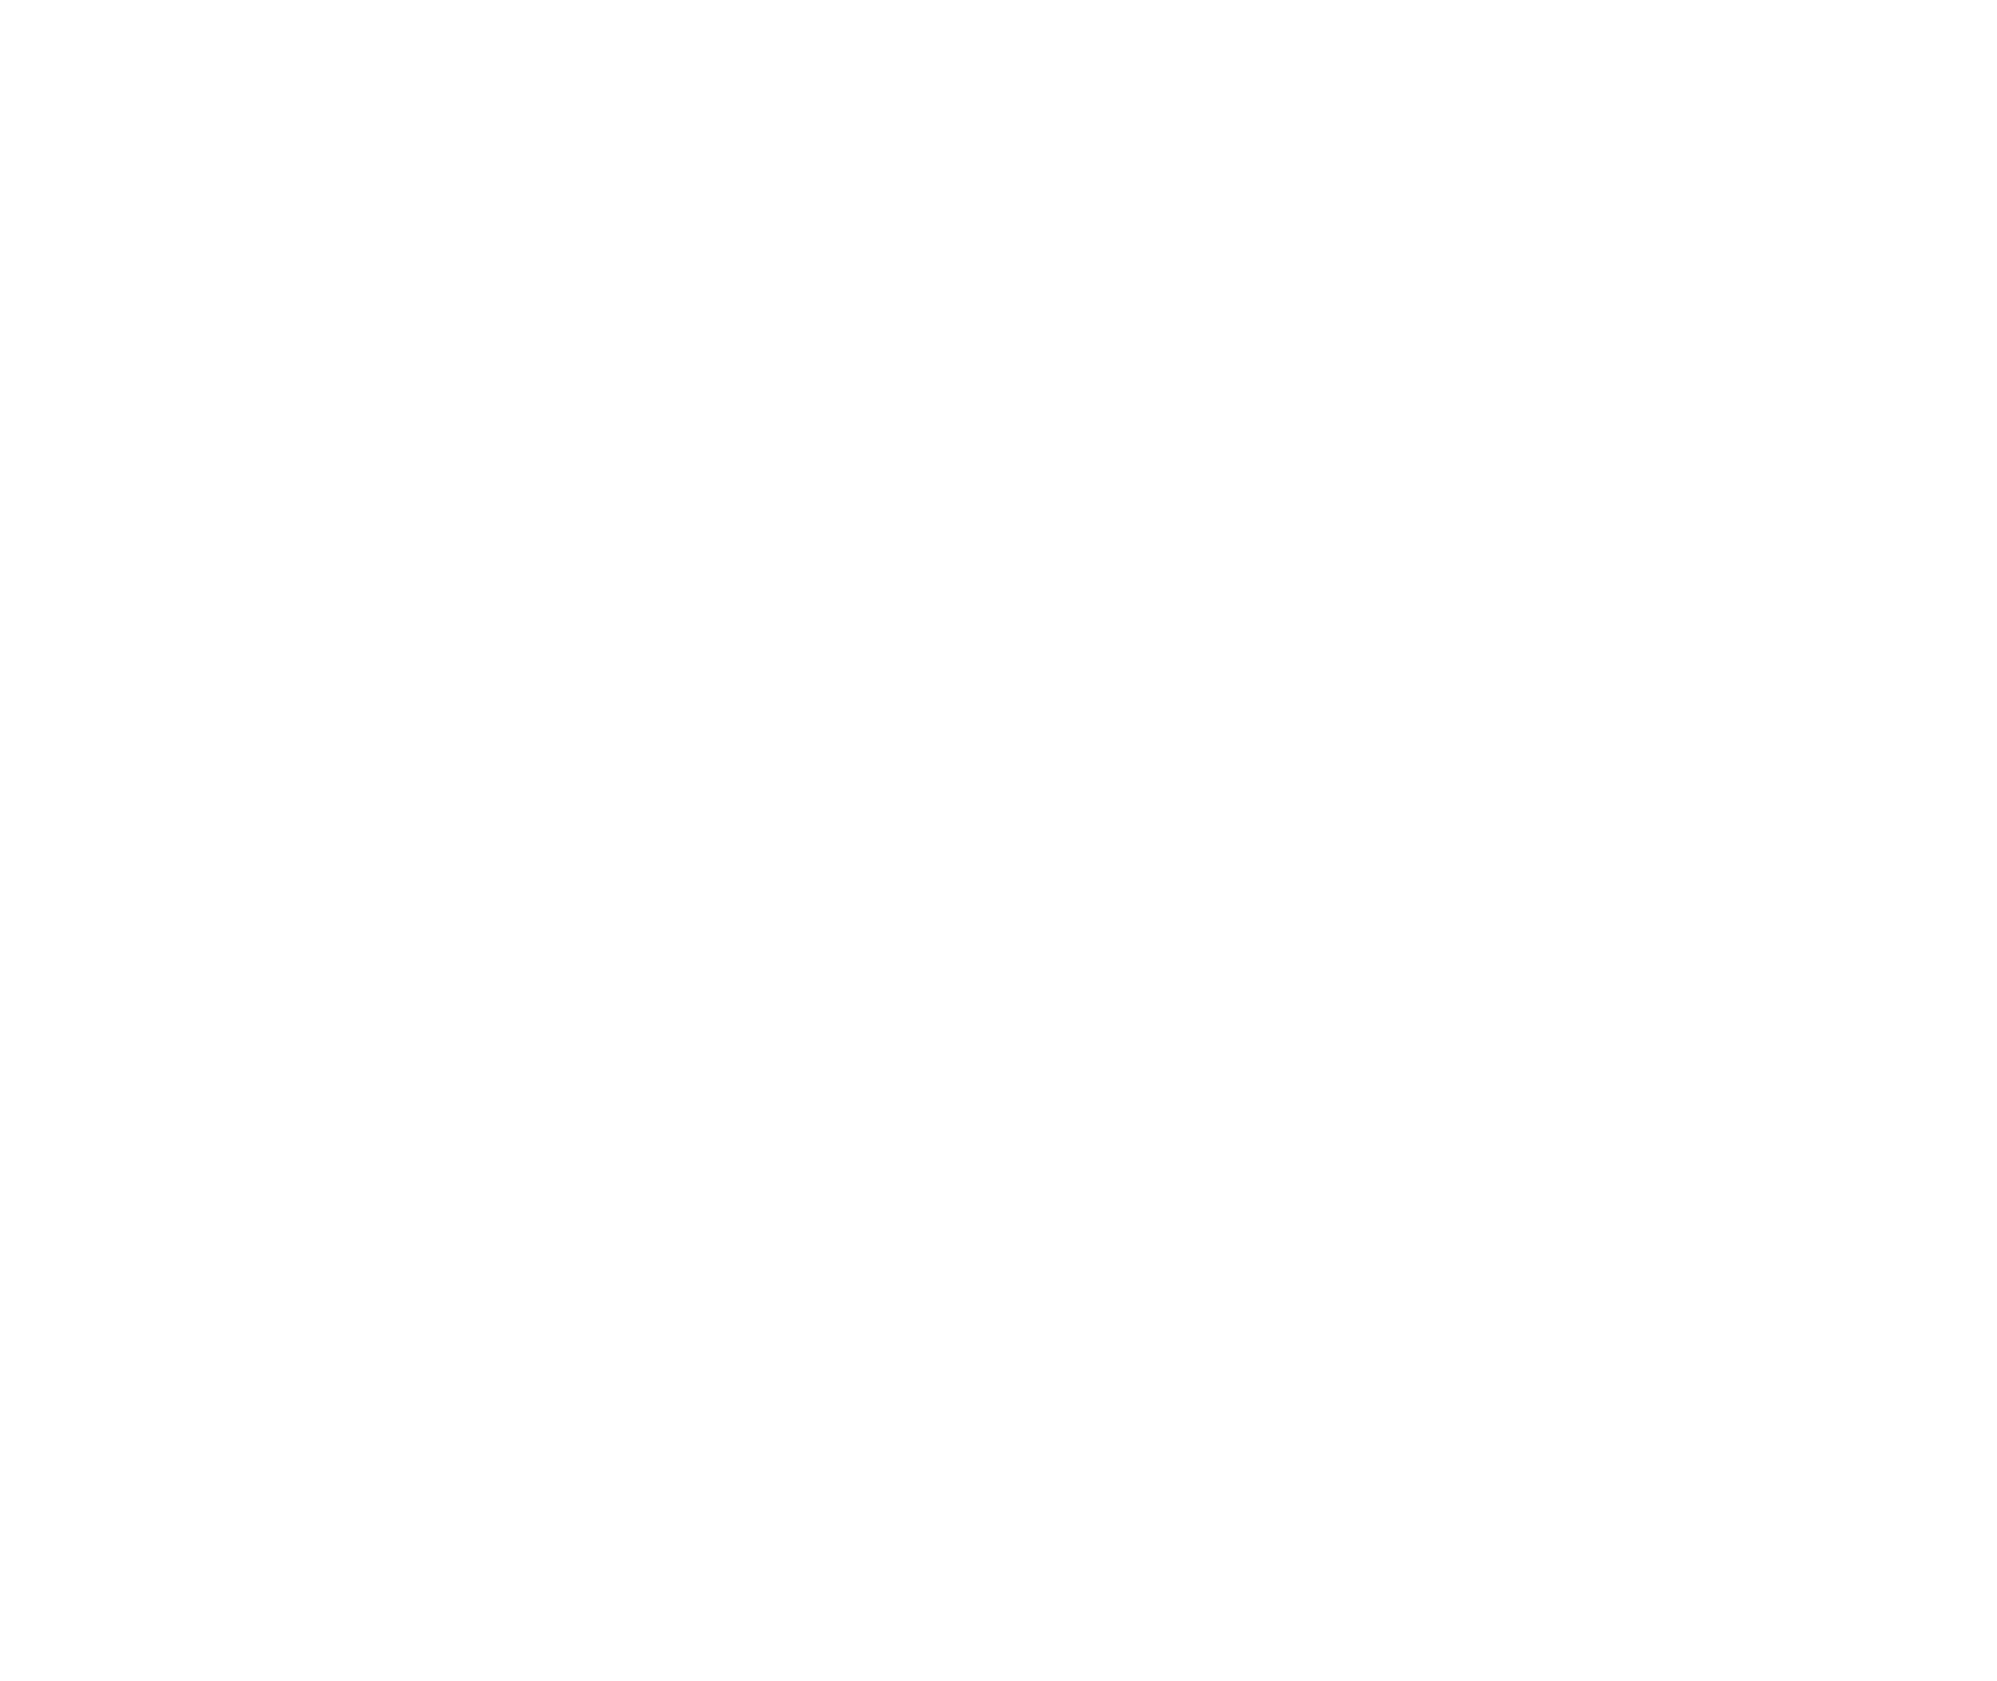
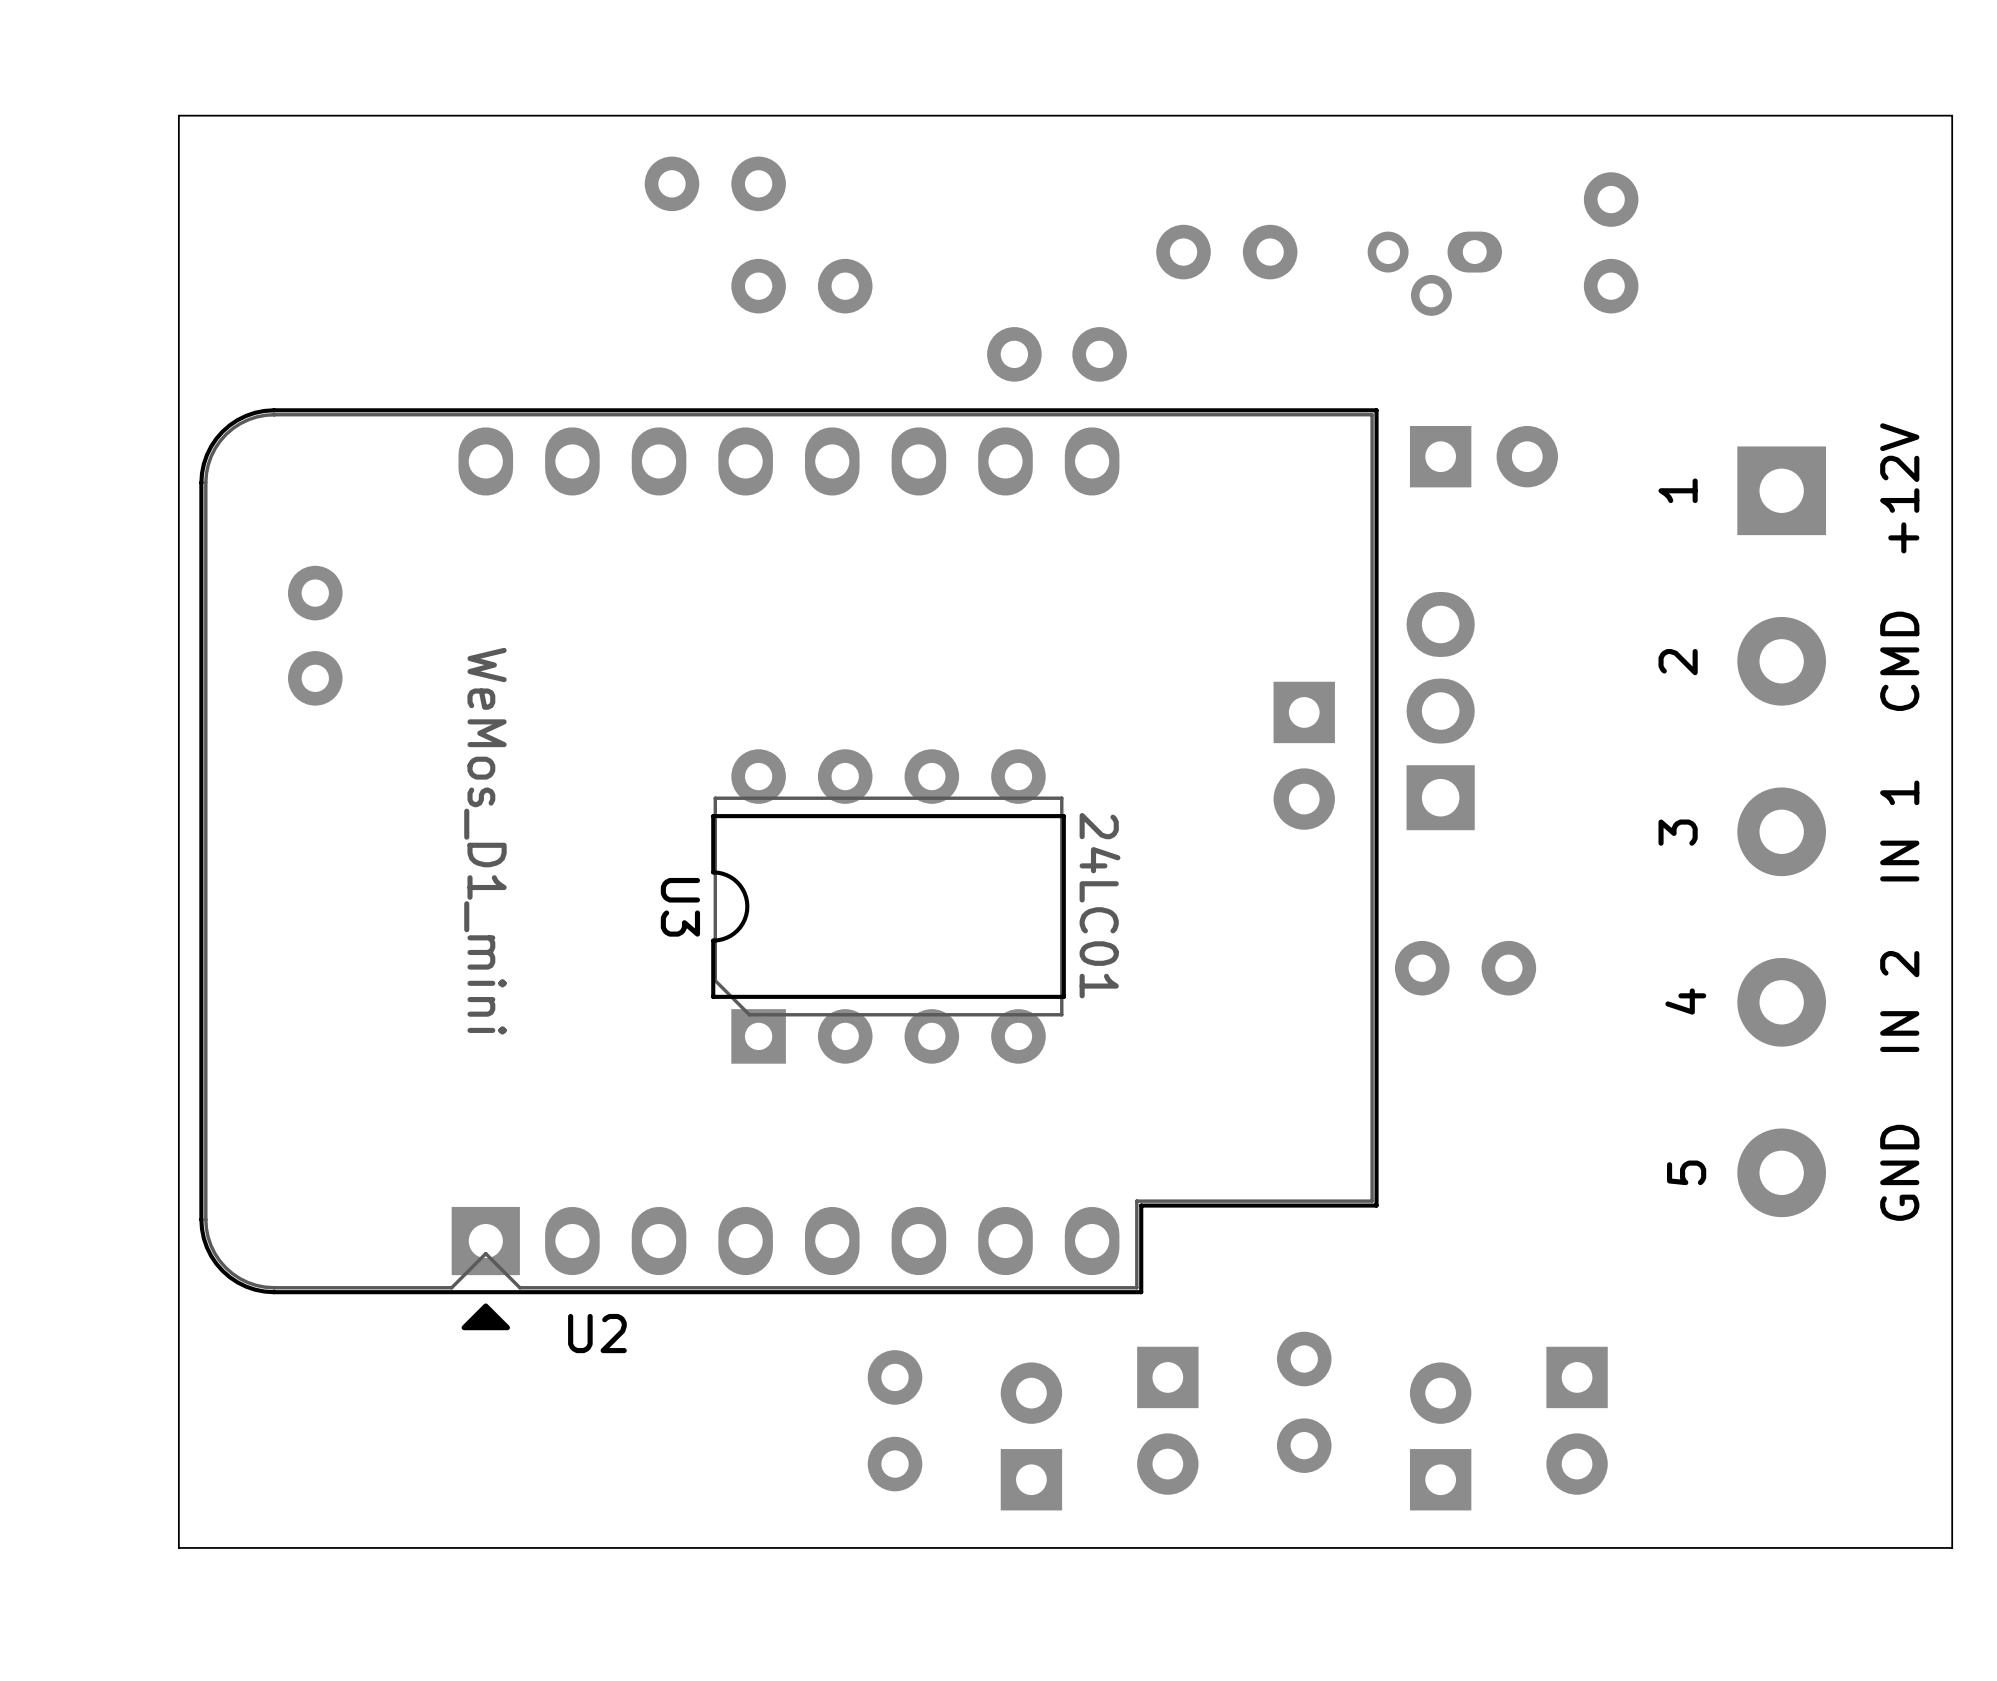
board edge: none -> (1952, 115) (178, 115) (178, 1547) (1952, 1547) (1952, 115)
part: none -> (715, 183)
part: none -> (1611, 242)
part: none -> (1226, 252)
part: none -> (1434, 273)
part: none -> (801, 286)
part: none -> (1057, 354)
part: none -> (1483, 456)
text: none -> +12V (1899, 488)
text: none -> 1 (1678, 490)
part: none -> (315, 635)
text: none -> 2 (1678, 662)
text: none -> CMD (1899, 661)
part: none -> (1440, 711)
part: none -> (1304, 755)
part: none -> (1781, 831)
text: none -> IN 1 (1899, 830)
text: none -> 3 (1678, 832)
U2: none -> WeMos_D1_mini (788, 869)
U3: none -> 24LC01 (888, 906)
part: none -> (1465, 968)
text: none -> IN 2 (1899, 1001)
text: none -> 4 (1685, 1001)
text: none -> 5 (1686, 1172)
text: none -> GND (1899, 1172)
part: none -> (1304, 1402)
part: none -> (895, 1420)
part: none -> (1167, 1420)
part: none -> (1577, 1420)
part: none -> (1031, 1436)
part: none -> (1440, 1436)

